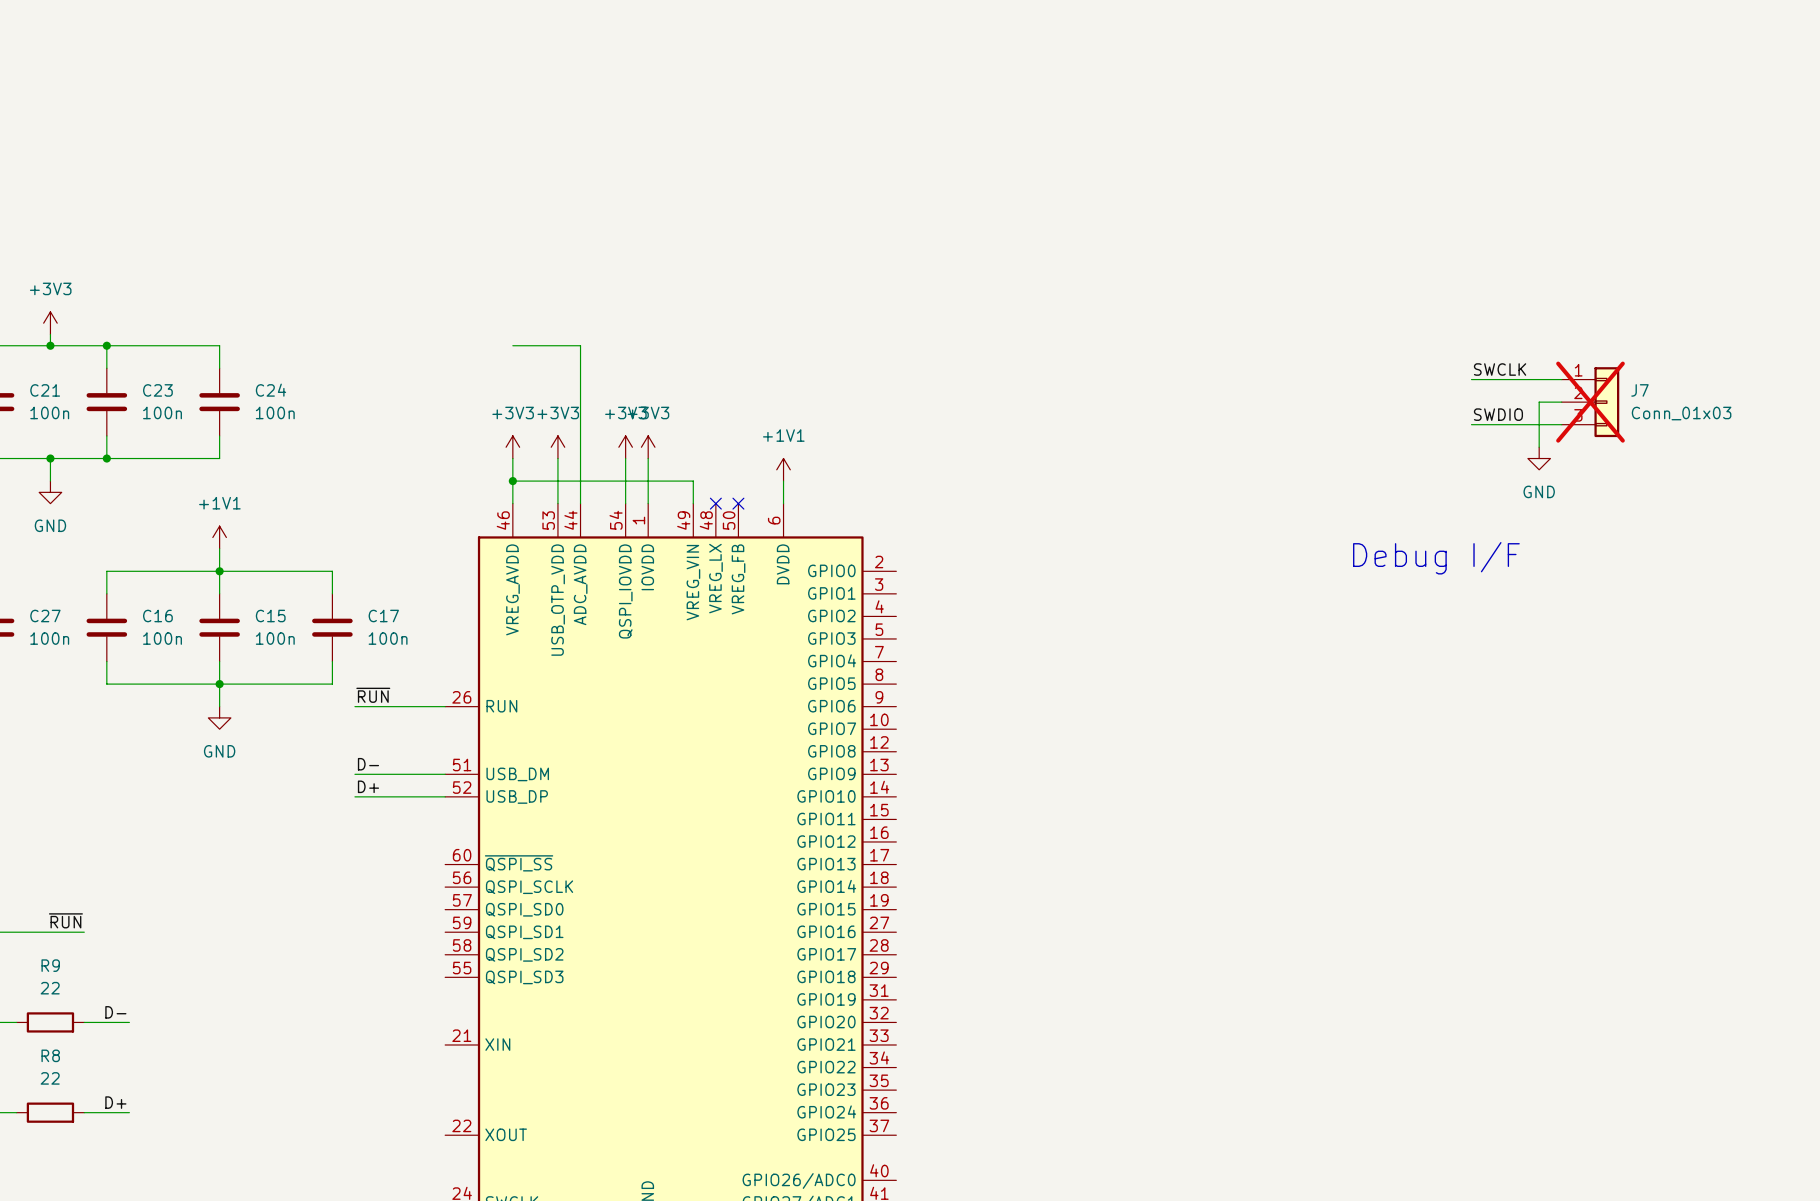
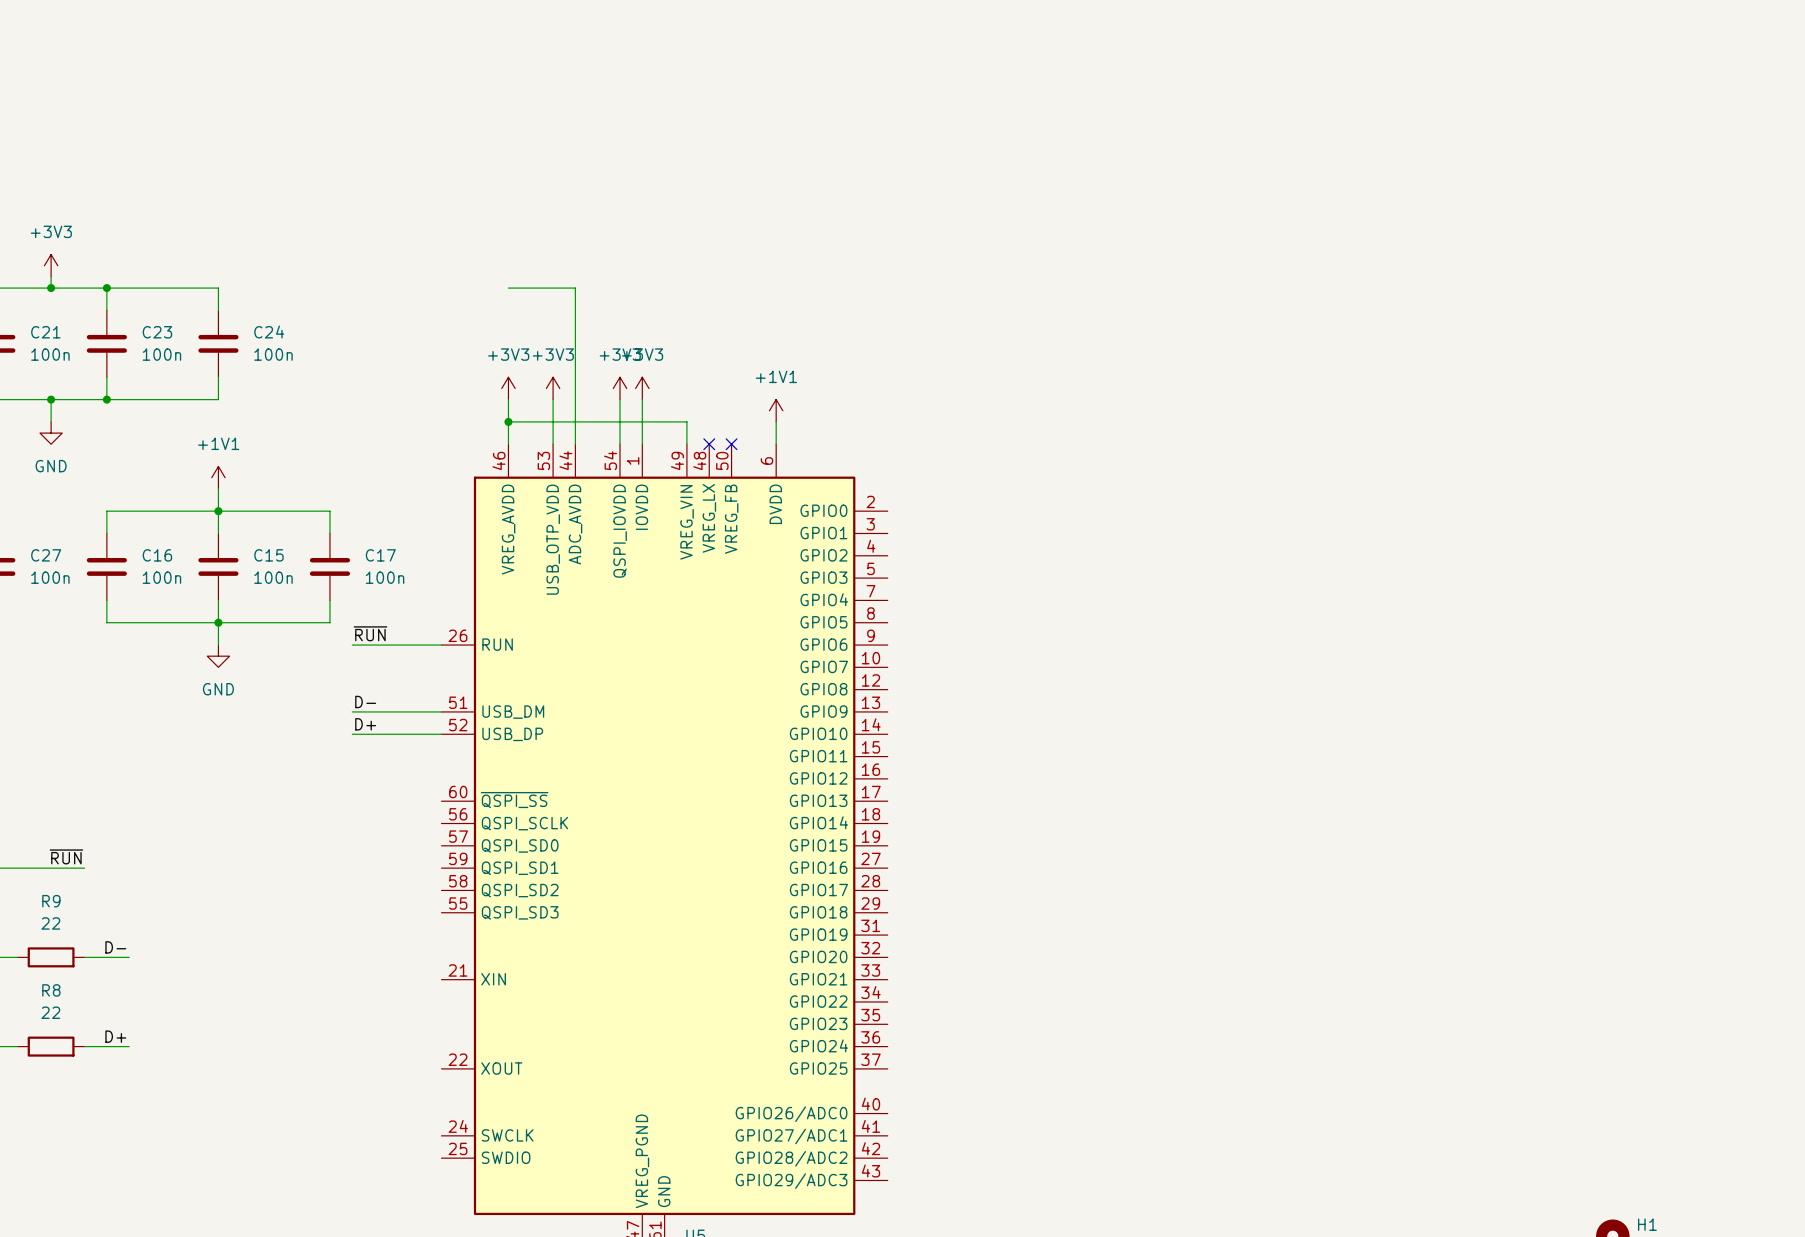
label: SWCLK (1500, 369) -> none
wire: (1471, 379) (1561, 379) -> none
wire: (1561, 402) (1539, 402) (1539, 447) -> none
J7: Conn_01x03 (1590, 402) -> none
label: SWDIO (1498, 414) -> none
wire: (1471, 424) (1561, 424) -> none
power symbol: GND (1539, 458) -> none
text: Debug I/F (1436, 558) -> none

